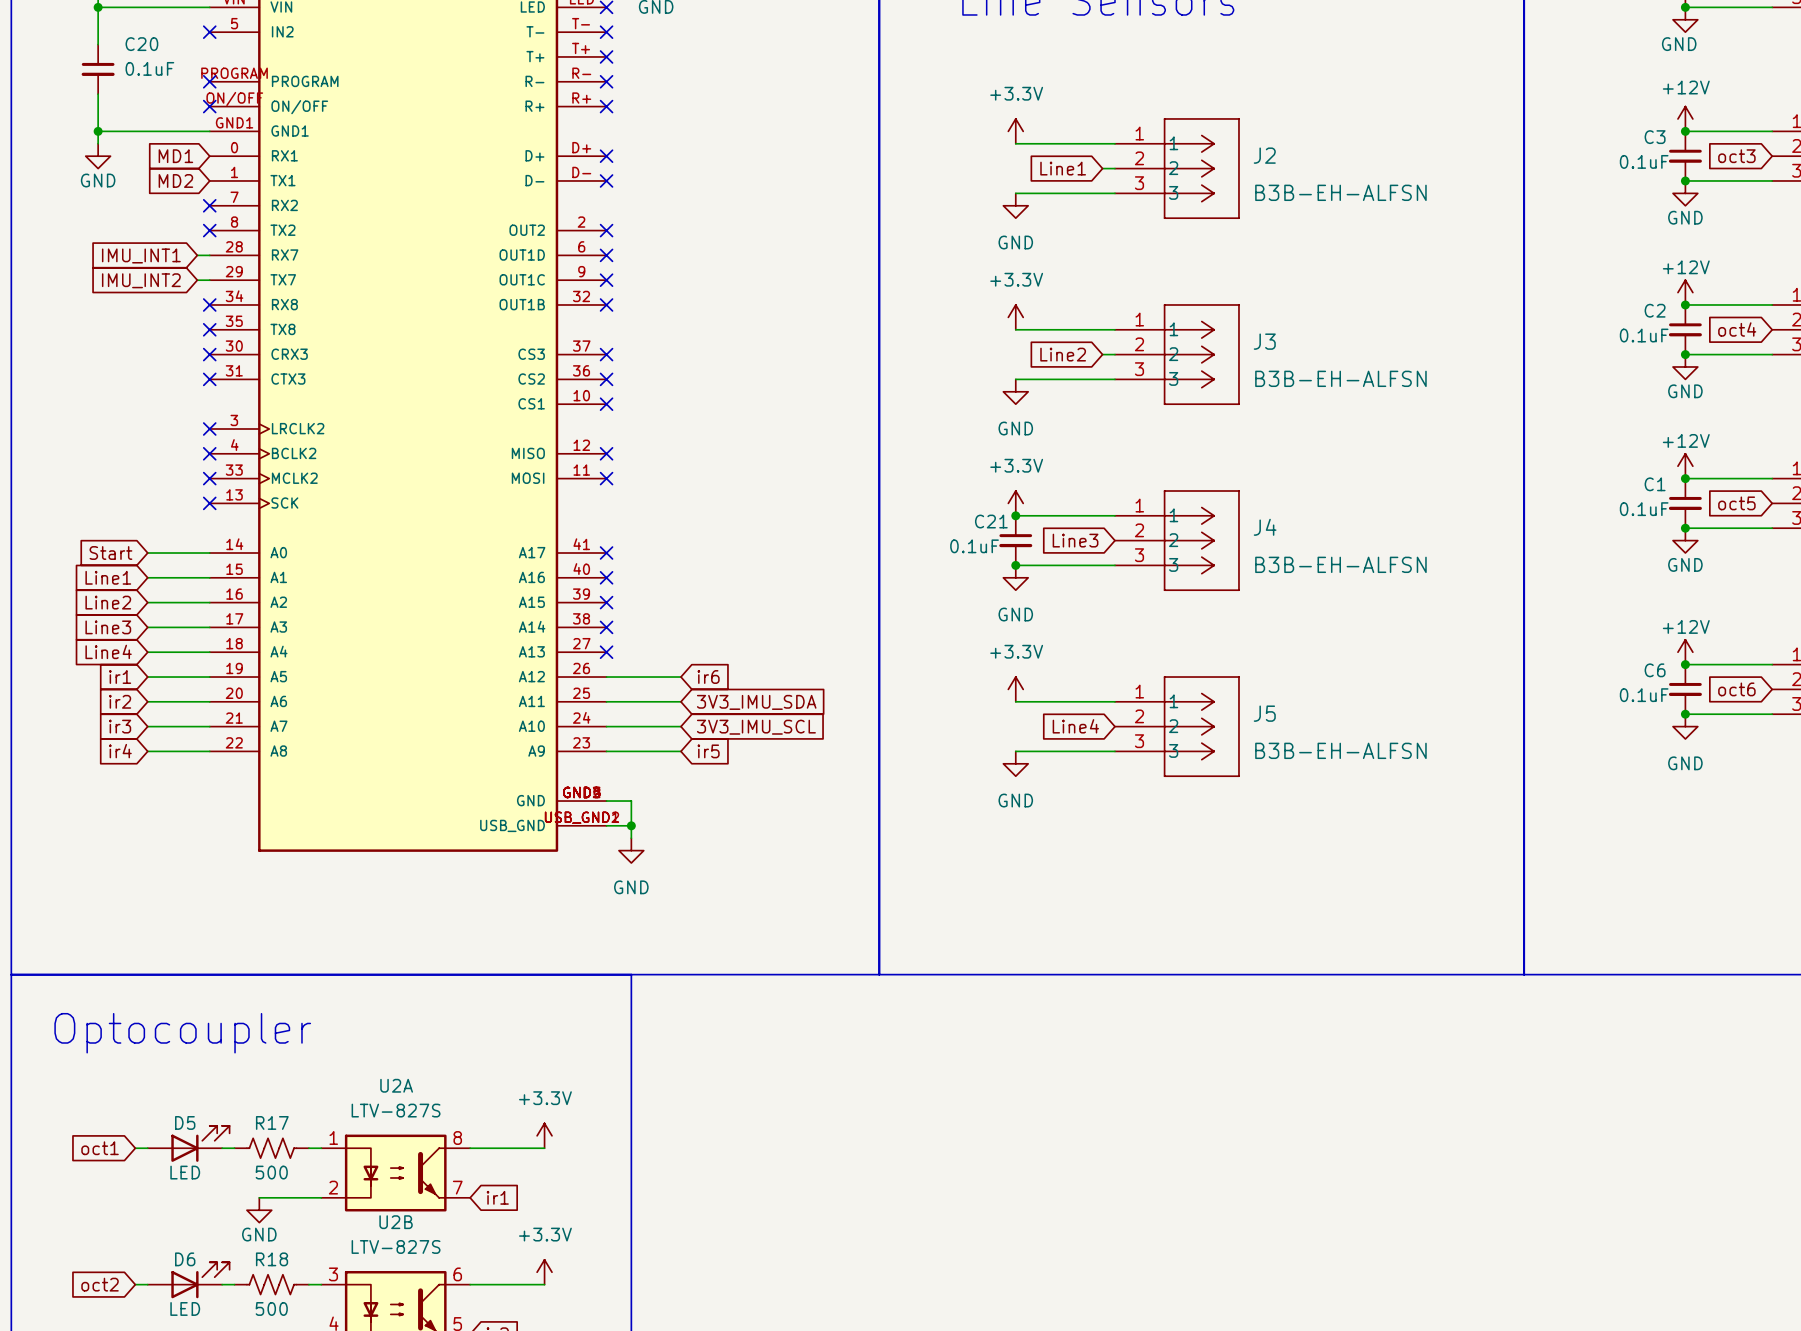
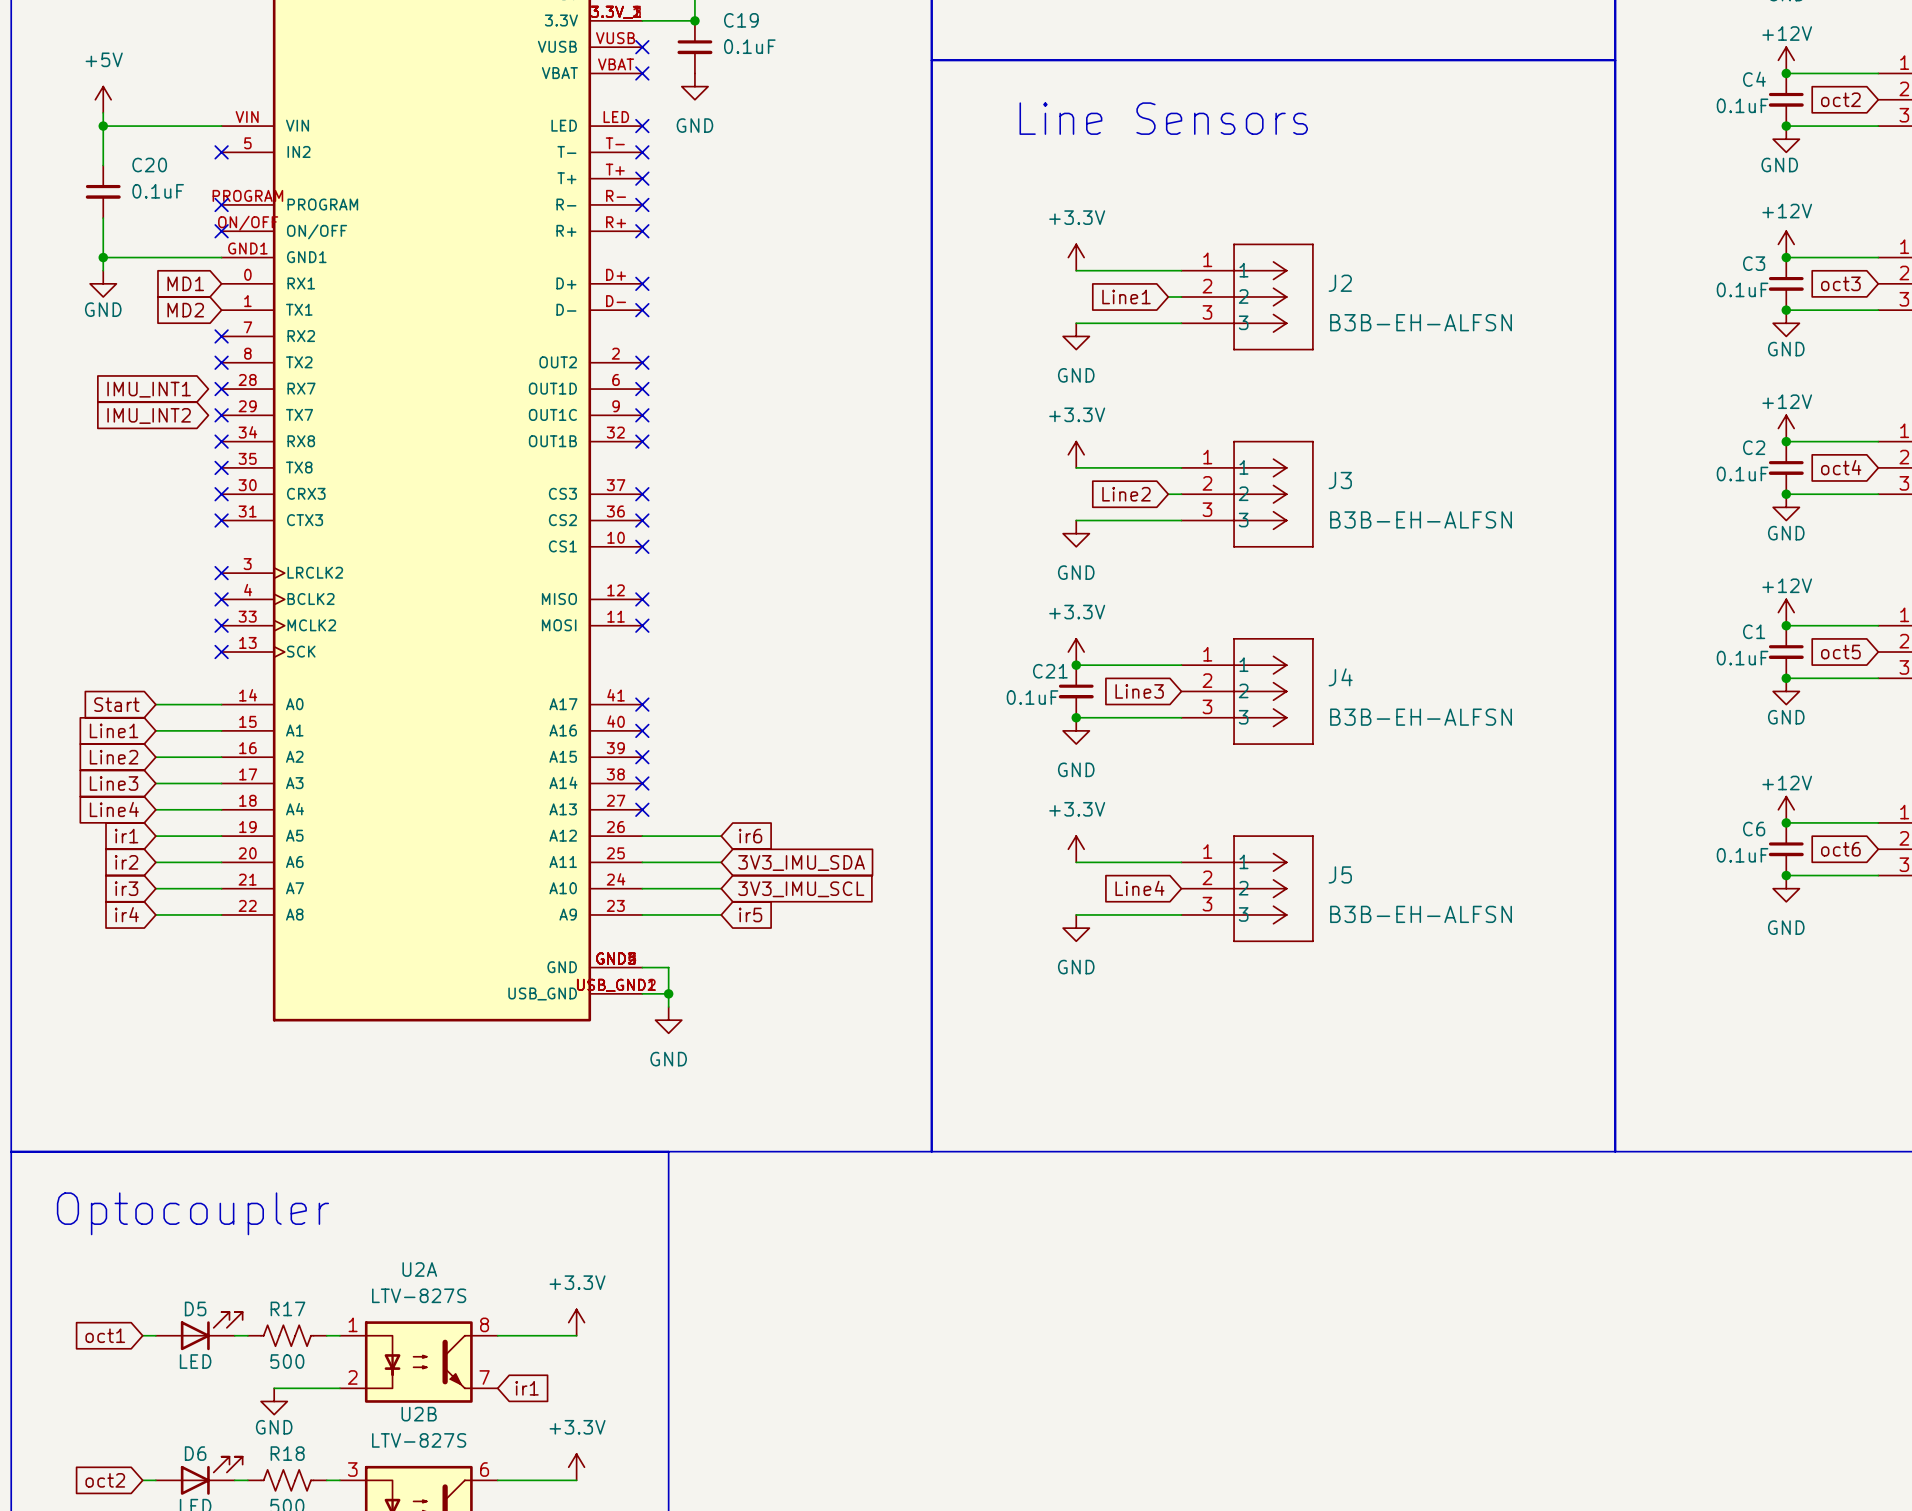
wire: (197, 255) (209, 255) -> none
no-connect mark: none -> (221, 389)
wire: (197, 280) (209, 280) -> none
no-connect mark: none -> (221, 415)

